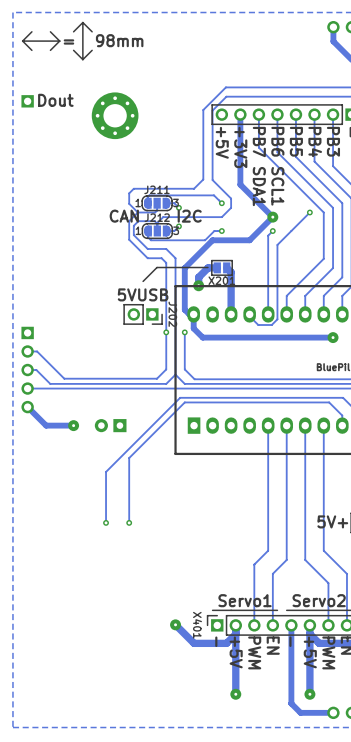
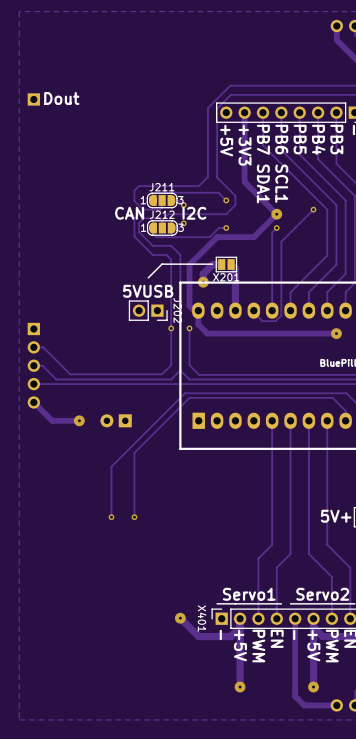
line: (82, 22) (82, 59) -> none
line: (82, 22) (73, 31) -> none
line: (82, 22) (92, 31) -> none
line: (31, 31) (22, 41) -> none
line: (50, 31) (59, 41) -> none
text: 98mm (119, 40) -> none
line: (22, 41) (31, 50) -> none
line: (59, 41) (50, 50) -> none
line: (59, 41) (22, 41) -> none
text: = (68, 41) -> none
line: (73, 50) (82, 59) -> none
line: (92, 50) (82, 59) -> none
part: (115, 115) -> none

